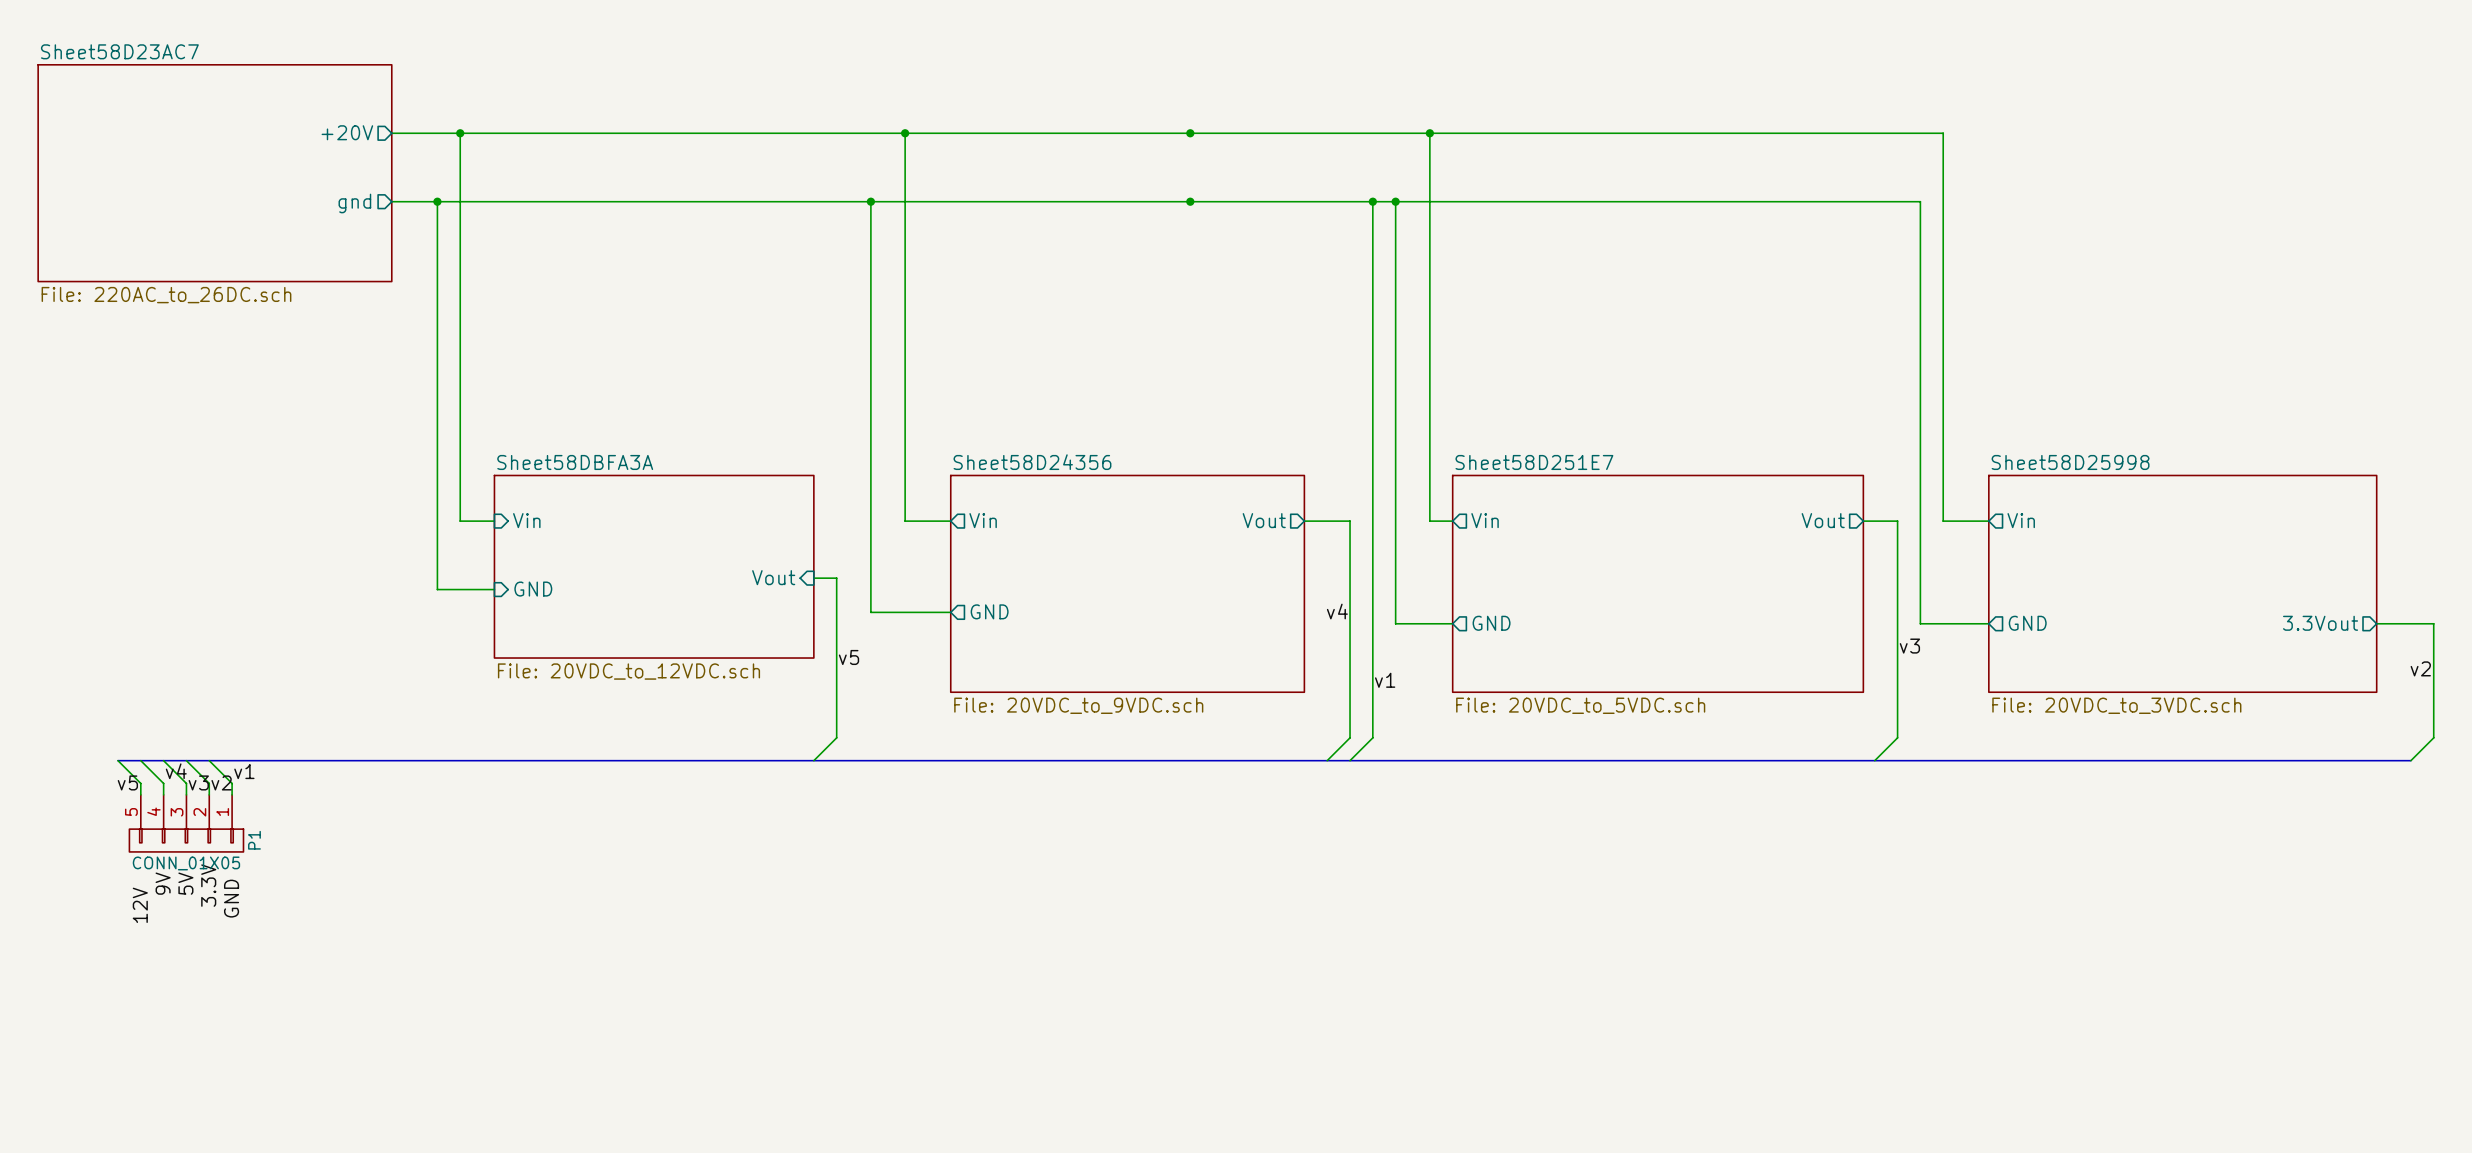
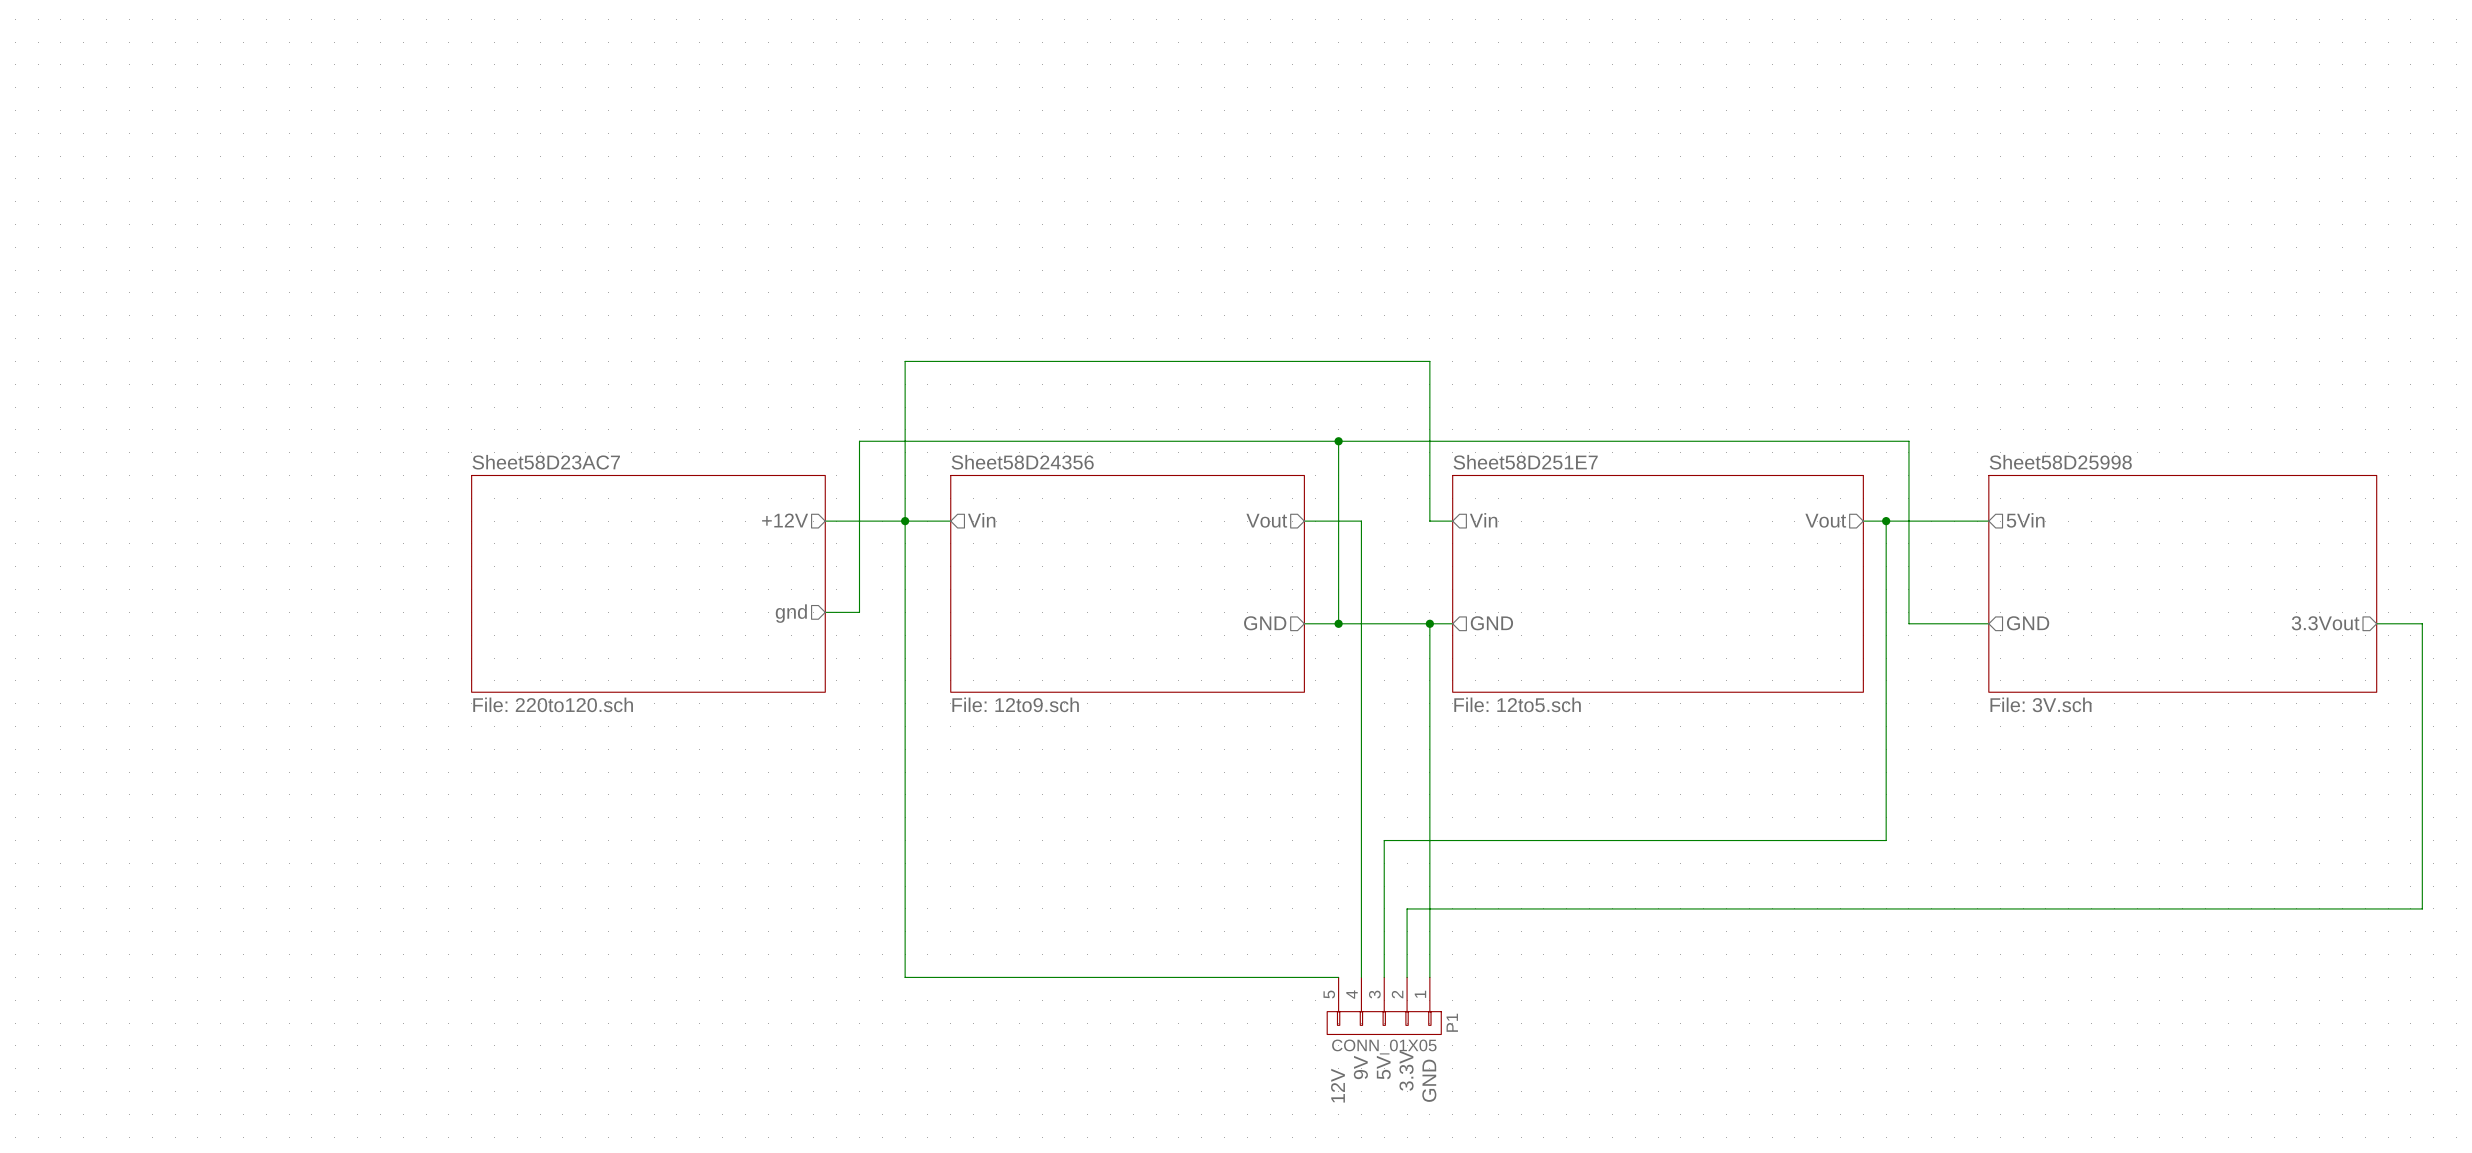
sheet pin: +20V (347, 132) -> none
wire: (391, 133) (1943, 133) (1943, 521) -> none
wire: (460, 133) (460, 521) (494, 521) -> none
junction: (460, 133) -> none
wire: (905, 133) (905, 361) -> (1429, 361) (905, 361)
junction: (905, 133) -> none
junction: (1190, 133) -> none
wire: (1429, 133) (1429, 361) -> none
junction: (1429, 133) -> none
sheet Sheet58D23AC7 position: (214, 173) -> (648, 583)
wire: (391, 201) (1920, 201) (1920, 623) -> (825, 612) (859, 612) (859, 441) (1908, 441) (1908, 623) (1920, 623)
wire: (437, 201) (437, 589) (494, 589) -> none
junction: (437, 201) -> none
wire: (870, 201) (870, 612) (950, 612) -> none
junction: (870, 201) -> none
junction: (1190, 201) -> none
wire: (1372, 201) (1372, 737) (1350, 760) -> none
junction: (1372, 201) -> none
wire: (1395, 201) (1395, 623) -> (1304, 623) (1395, 623)
junction: (1395, 201) -> none
sheet pin: gnd (354, 203) -> none
sheet Sheet58D23AC7 value: File: 220AC_to_26DC.sch (166, 295) -> File: 220to120.sch (553, 704)
wire: none -> (1338, 441) (1338, 623)
junction: none -> (1338, 441)
sheet pin: Vin (526, 520) -> none
sheet pin: none -> +12V (785, 520)
sheet pin: Vin (2021, 520) -> 5Vin (2025, 520)
wire: none -> (825, 521) (905, 521) (905, 977) (1338, 977)
junction: none -> (905, 521)
wire: (1350, 521) (1350, 737) (1327, 760) -> (1350, 521) (1361, 521) (1361, 977)
wire: none -> (1886, 521) (1886, 840) (1384, 840) (1384, 977)
junction: none -> (1886, 521)
wire: (1897, 521) (1897, 737) (1874, 760) -> (1897, 521) (1943, 521)
sheet Sheet58DBFA3A: File: 20VDC_to_12VDC.sch (654, 566) -> none
sheet pin: Vout (773, 577) -> none
wire: (813, 578) (836, 578) (836, 737) (813, 760) -> none
sheet pin: GND (533, 589) -> none
sheet pin: GND (989, 611) -> none
label: v4 (1337, 611) -> none
sheet pin: none -> gnd (791, 613)
sheet pin: none -> GND (1265, 623)
junction: none -> (1338, 623)
wire: none -> (1429, 623) (1429, 977)
junction: none -> (1429, 623)
wire: (2422, 623) (2433, 623) (2433, 737) (2410, 760) -> (2422, 623) (2422, 908) (1407, 908) (1407, 977)
label: v3 (1909, 646) -> none
label: v5 (848, 657) -> none
label: v2 (2420, 668) -> none
label: v1 (1385, 680) -> none
sheet Sheet58D24356 value: File: 20VDC_to_9VDC.sch (1078, 705) -> File: 12to9.sch (1015, 704)
sheet Sheet58D251E7 value: File: 20VDC_to_5VDC.sch (1580, 705) -> File: 12to5.sch (1517, 704)
sheet Sheet58D25998 value: File: 20VDC_to_3VDC.sch (2116, 705) -> File: 3V.sch (2040, 704)
wire: (118, 760) (140, 783) (140, 794) -> none
bus: (118, 760) (2410, 760) -> none
wire: (140, 760) (163, 783) (163, 794) -> none
wire: (163, 760) (186, 783) (186, 794) -> none
wire: (186, 760) (209, 783) (209, 794) -> none
wire: (209, 760) (232, 783) (232, 794) -> none
label: v4 (176, 771) -> none
label: v1 (244, 771) -> none
label: v5 (127, 782) -> none
label: v3 (198, 782) -> none
label: v2 (221, 782) -> none
P1 position: (186, 823) -> (1384, 1005)
label: 9V (163, 883) -> none
label: 5V (185, 883) -> none
label: 3.3V (208, 885) -> none
label: GND (231, 898) -> none
label: 12V (140, 905) -> none
label: none -> 9V (1360, 1067)
label: none -> 5V (1383, 1067)
label: none -> 3.3V (1406, 1070)
label: none -> GND (1429, 1080)
label: none -> 12V (1337, 1085)

